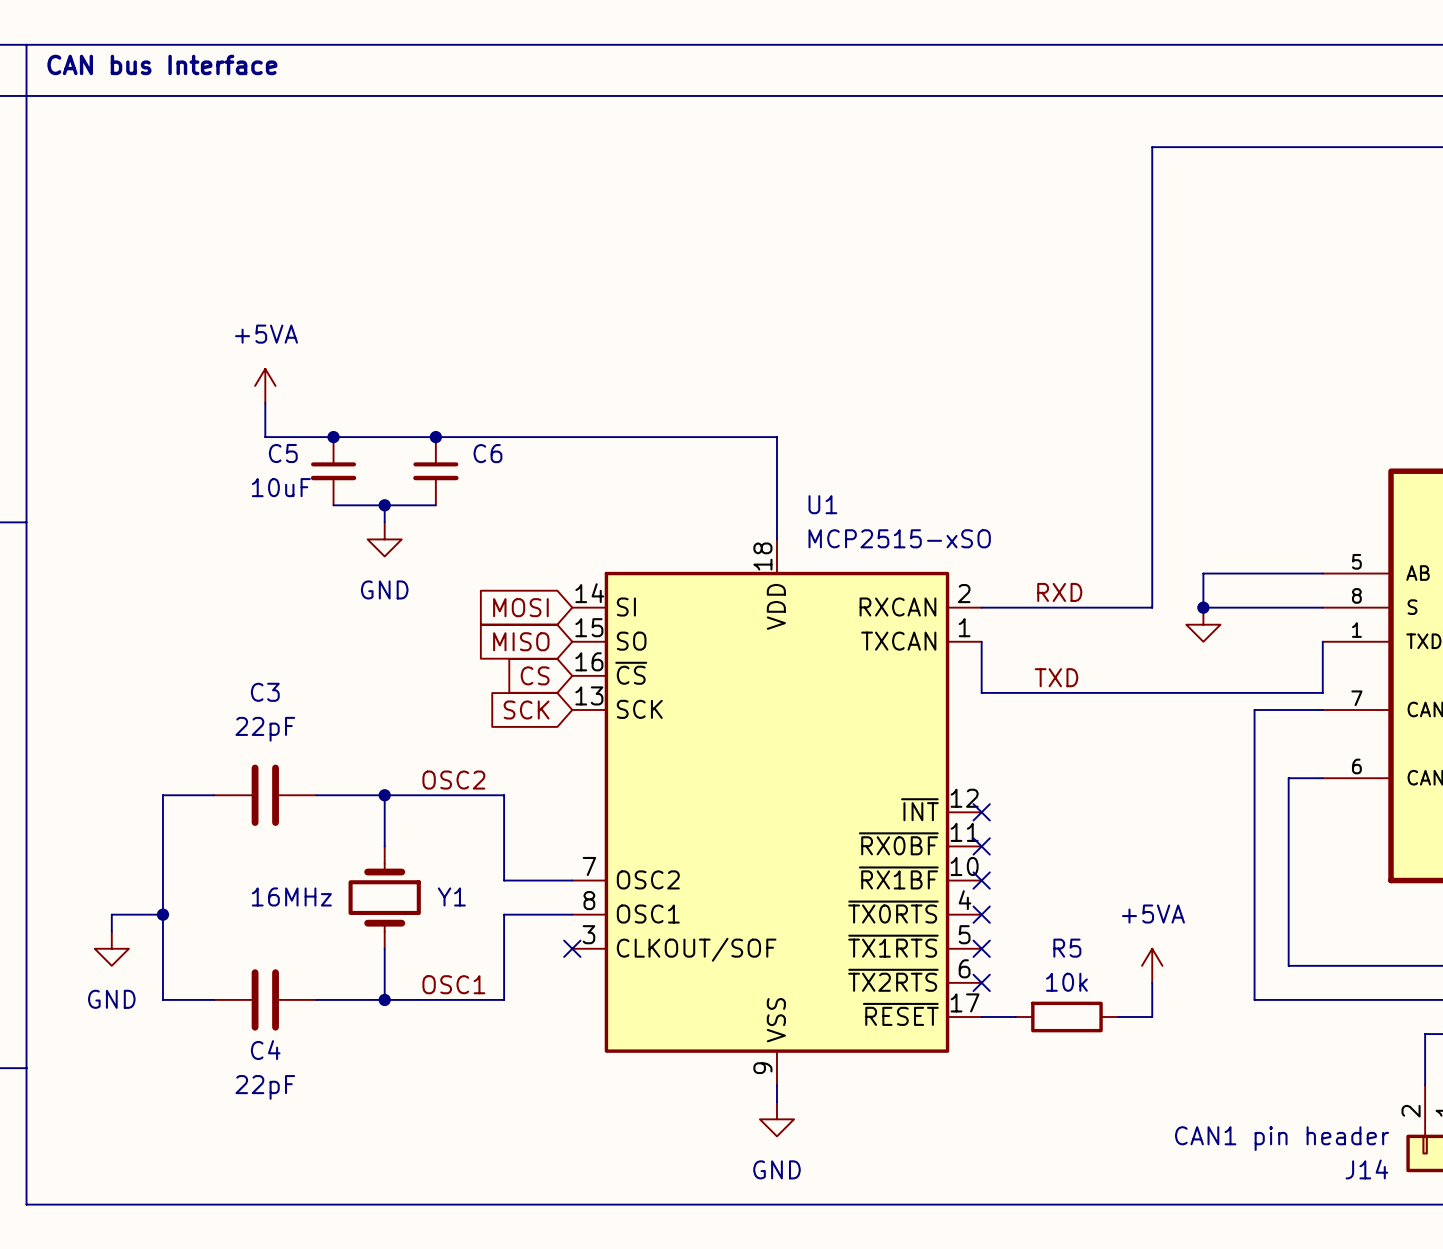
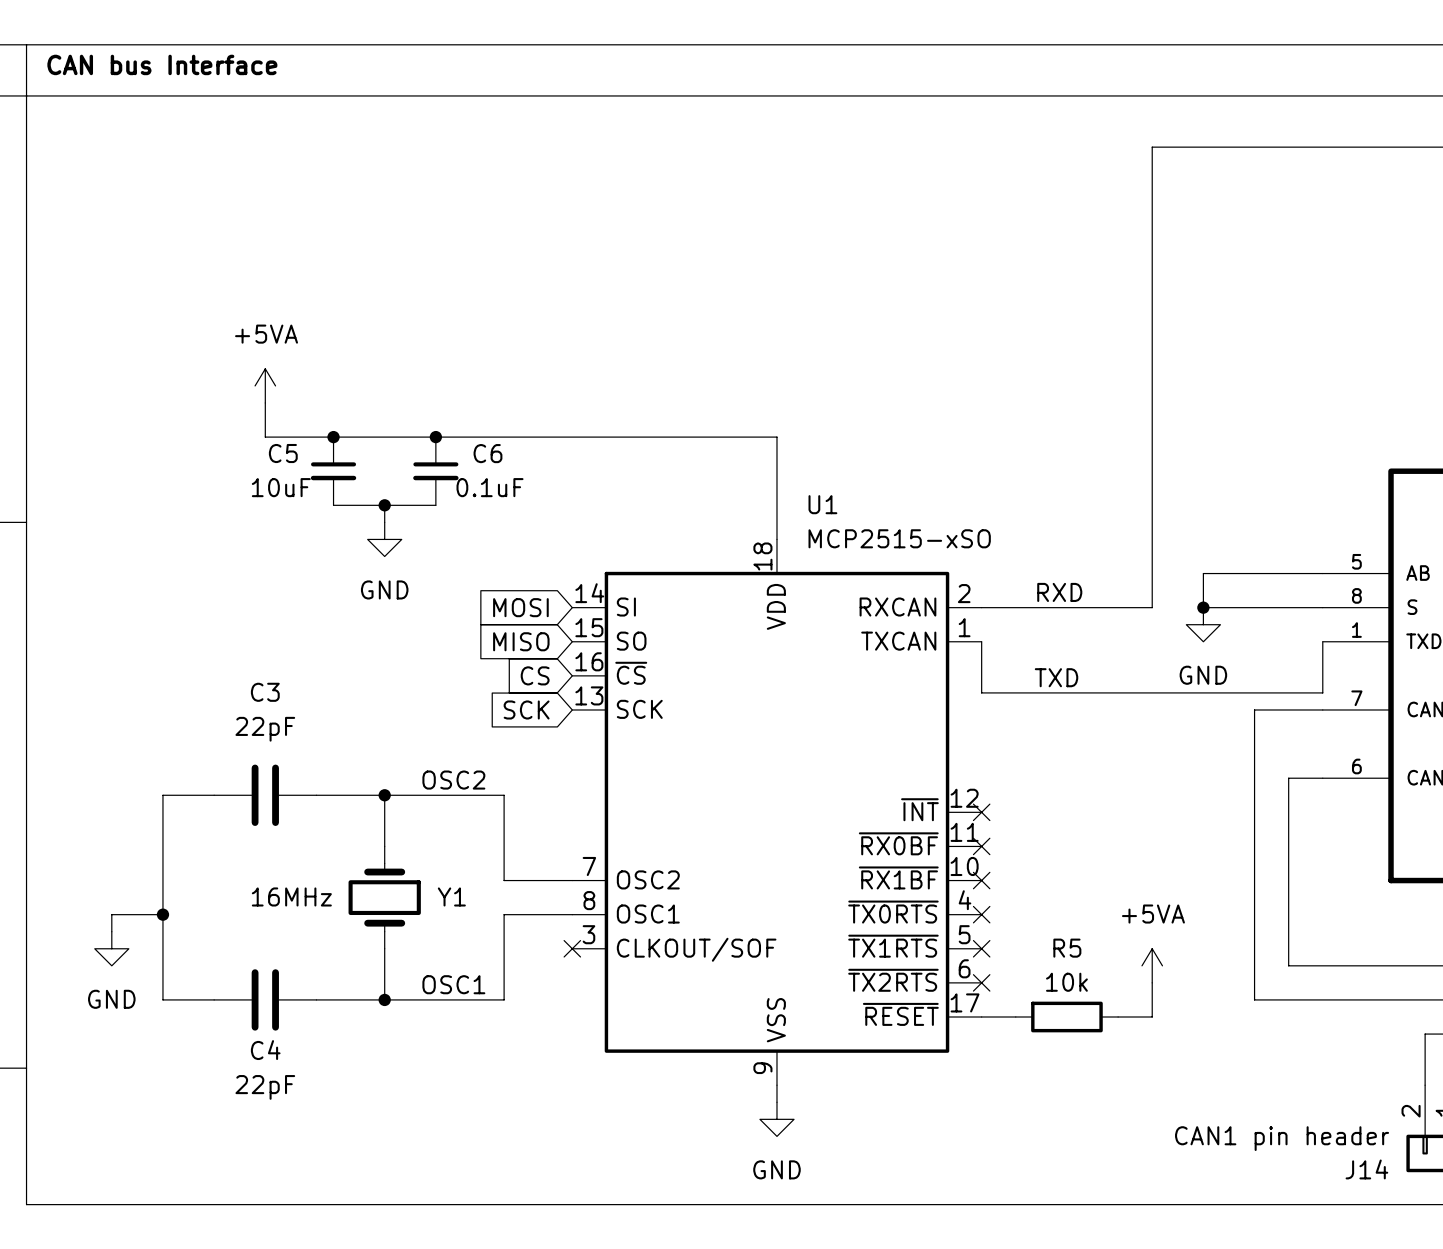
C6 value: none -> 0.1uF (490, 487)
power symbol text: none -> GND (1203, 675)

